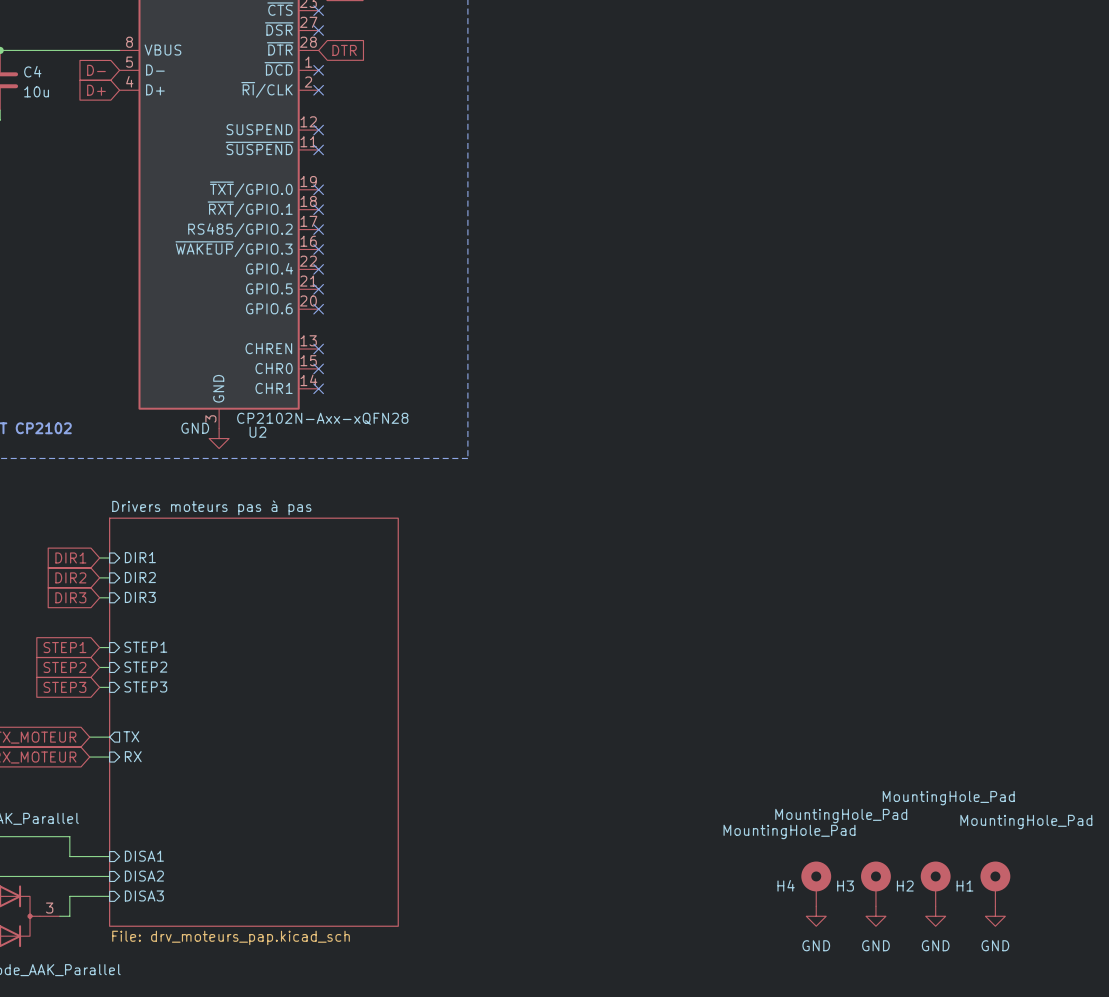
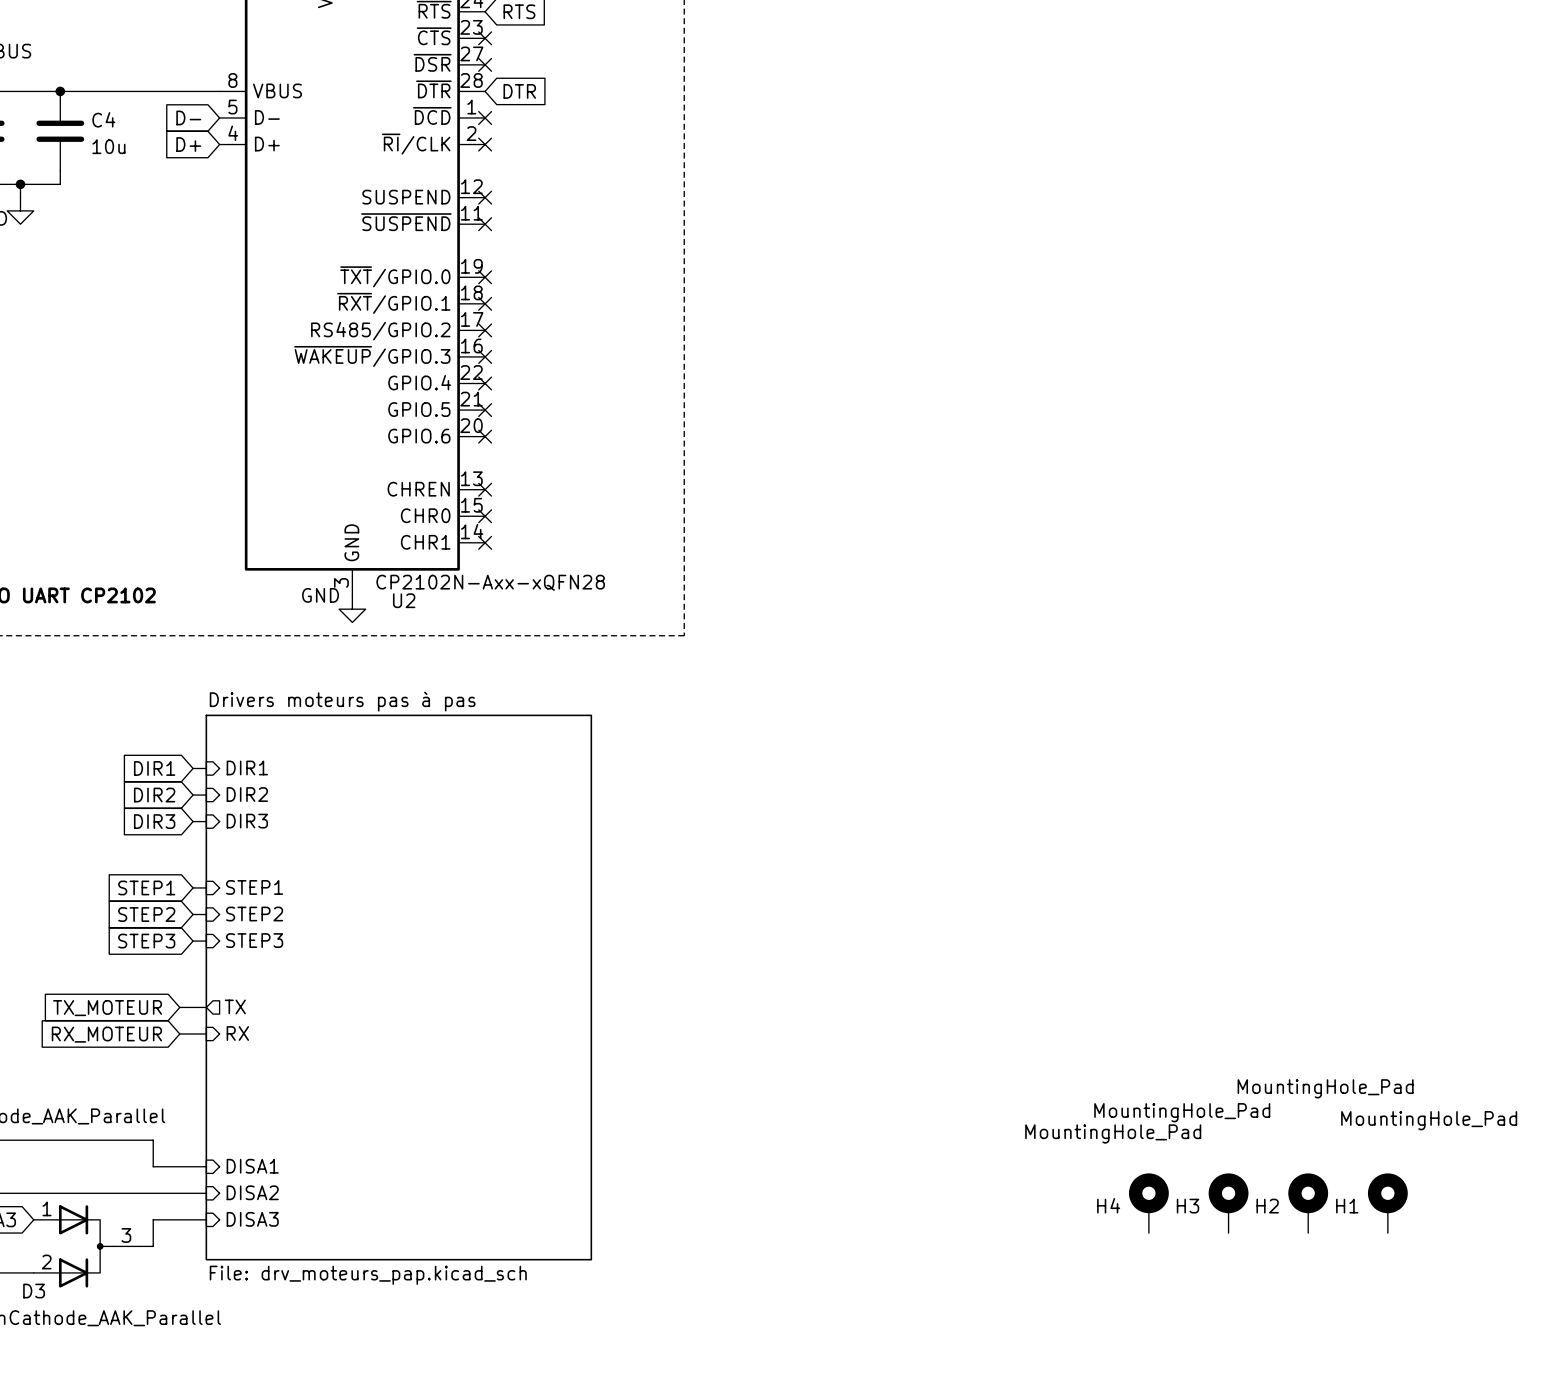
power symbol: GND (816, 916) -> none
power symbol: GND (875, 916) -> none
power symbol: GND (935, 916) -> none
power symbol: GND (995, 916) -> none

